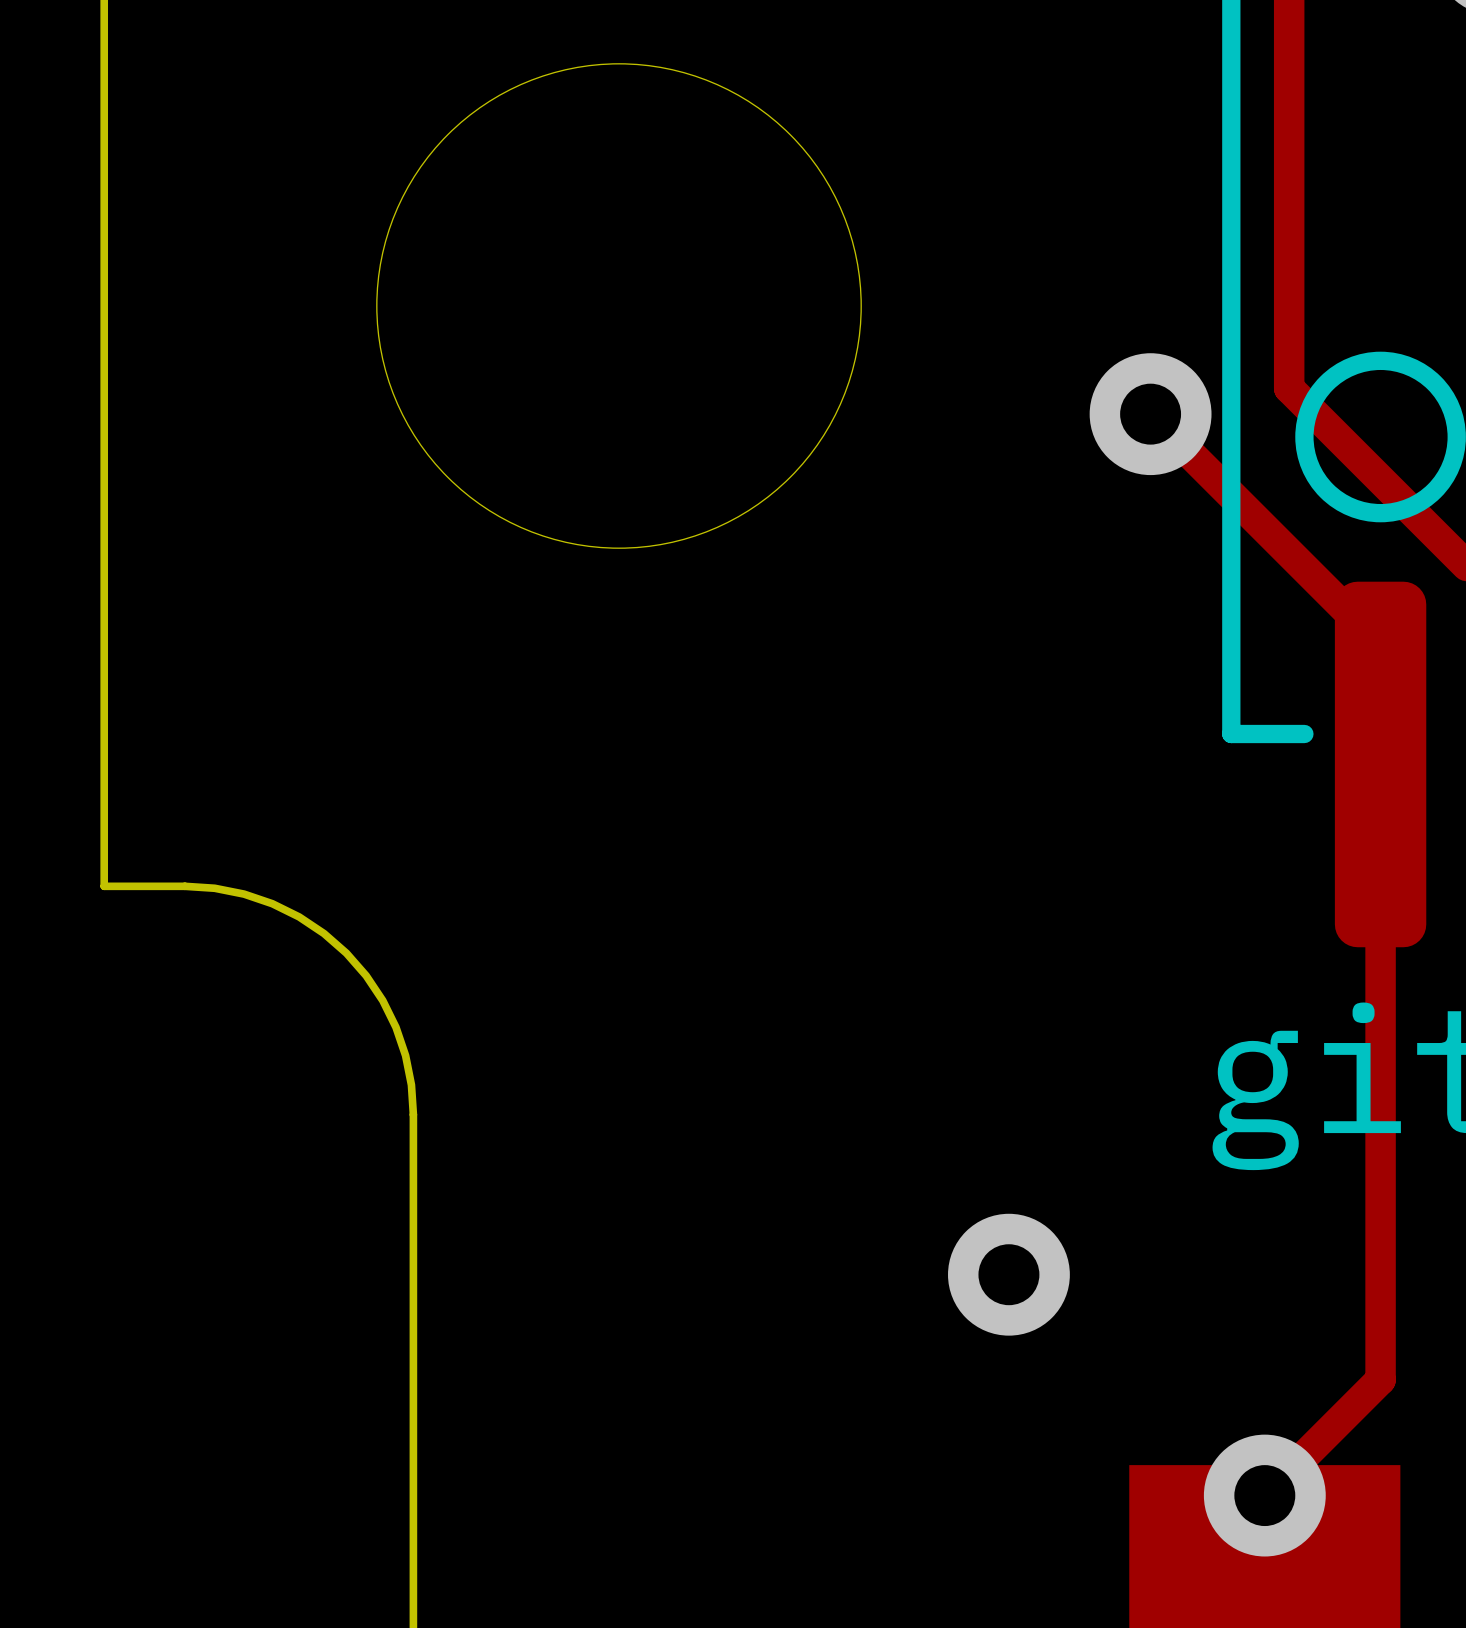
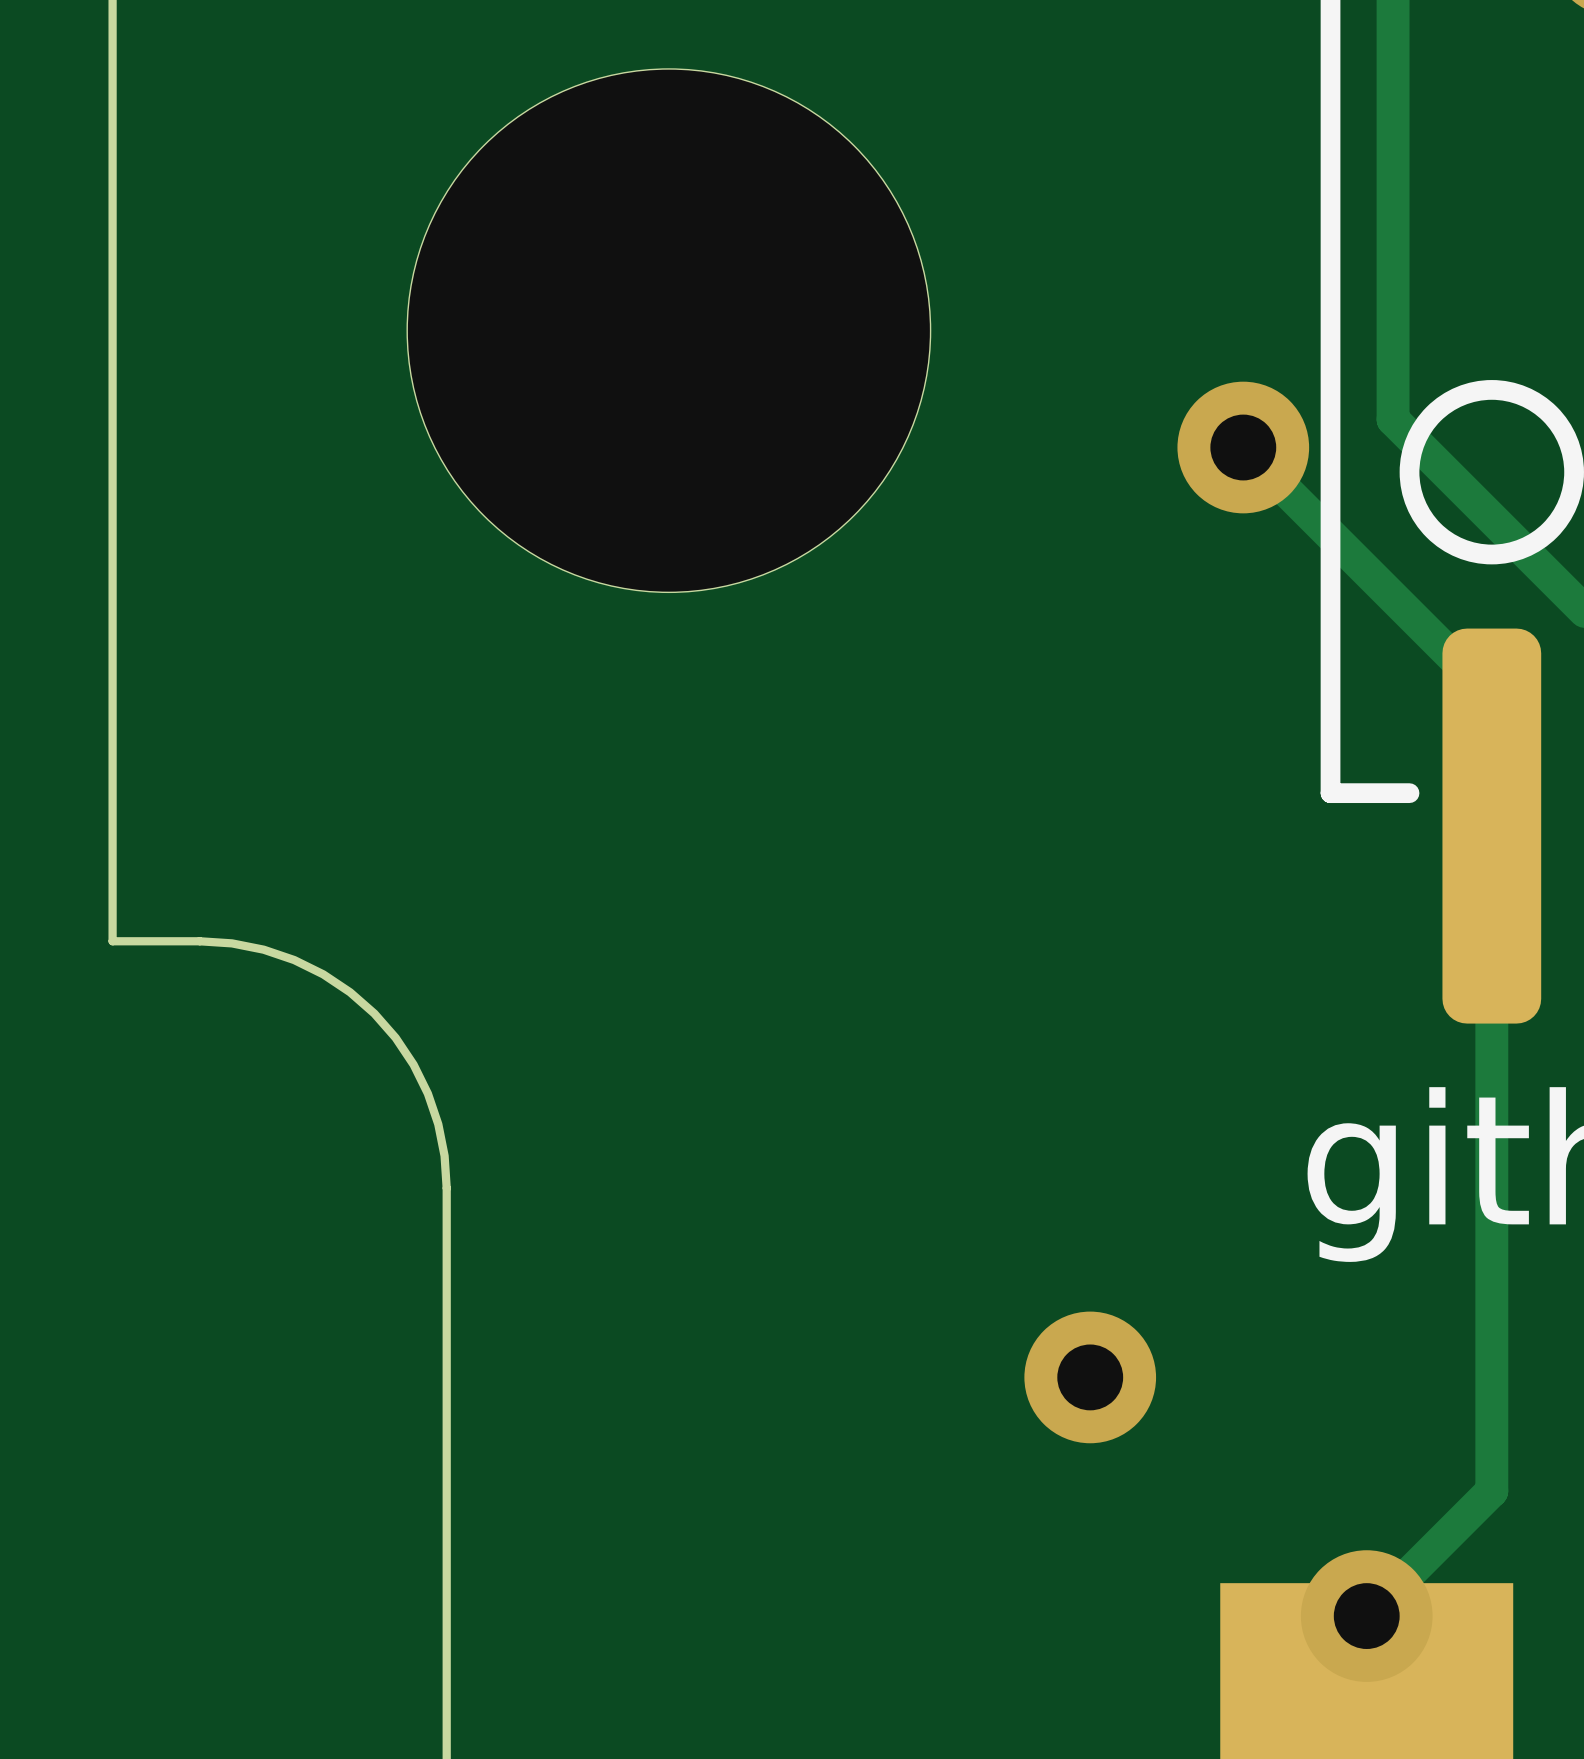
board edge: (104, 871) (104, 886) (184, 886) (214, 888) (244, 894) (272, 903) (299, 916) (324, 933) (346, 953) (366, 975) (382, 1000) (396, 1027) (405, 1055) (411, 1084) (413, 1114) -> (112, 941) (199, 941) (232, 943) (263, 949) (294, 960) (323, 974) (350, 992) (374, 1013) (395, 1037) (413, 1064) (427, 1093) (438, 1124) (444, 1155) (446, 1204)

